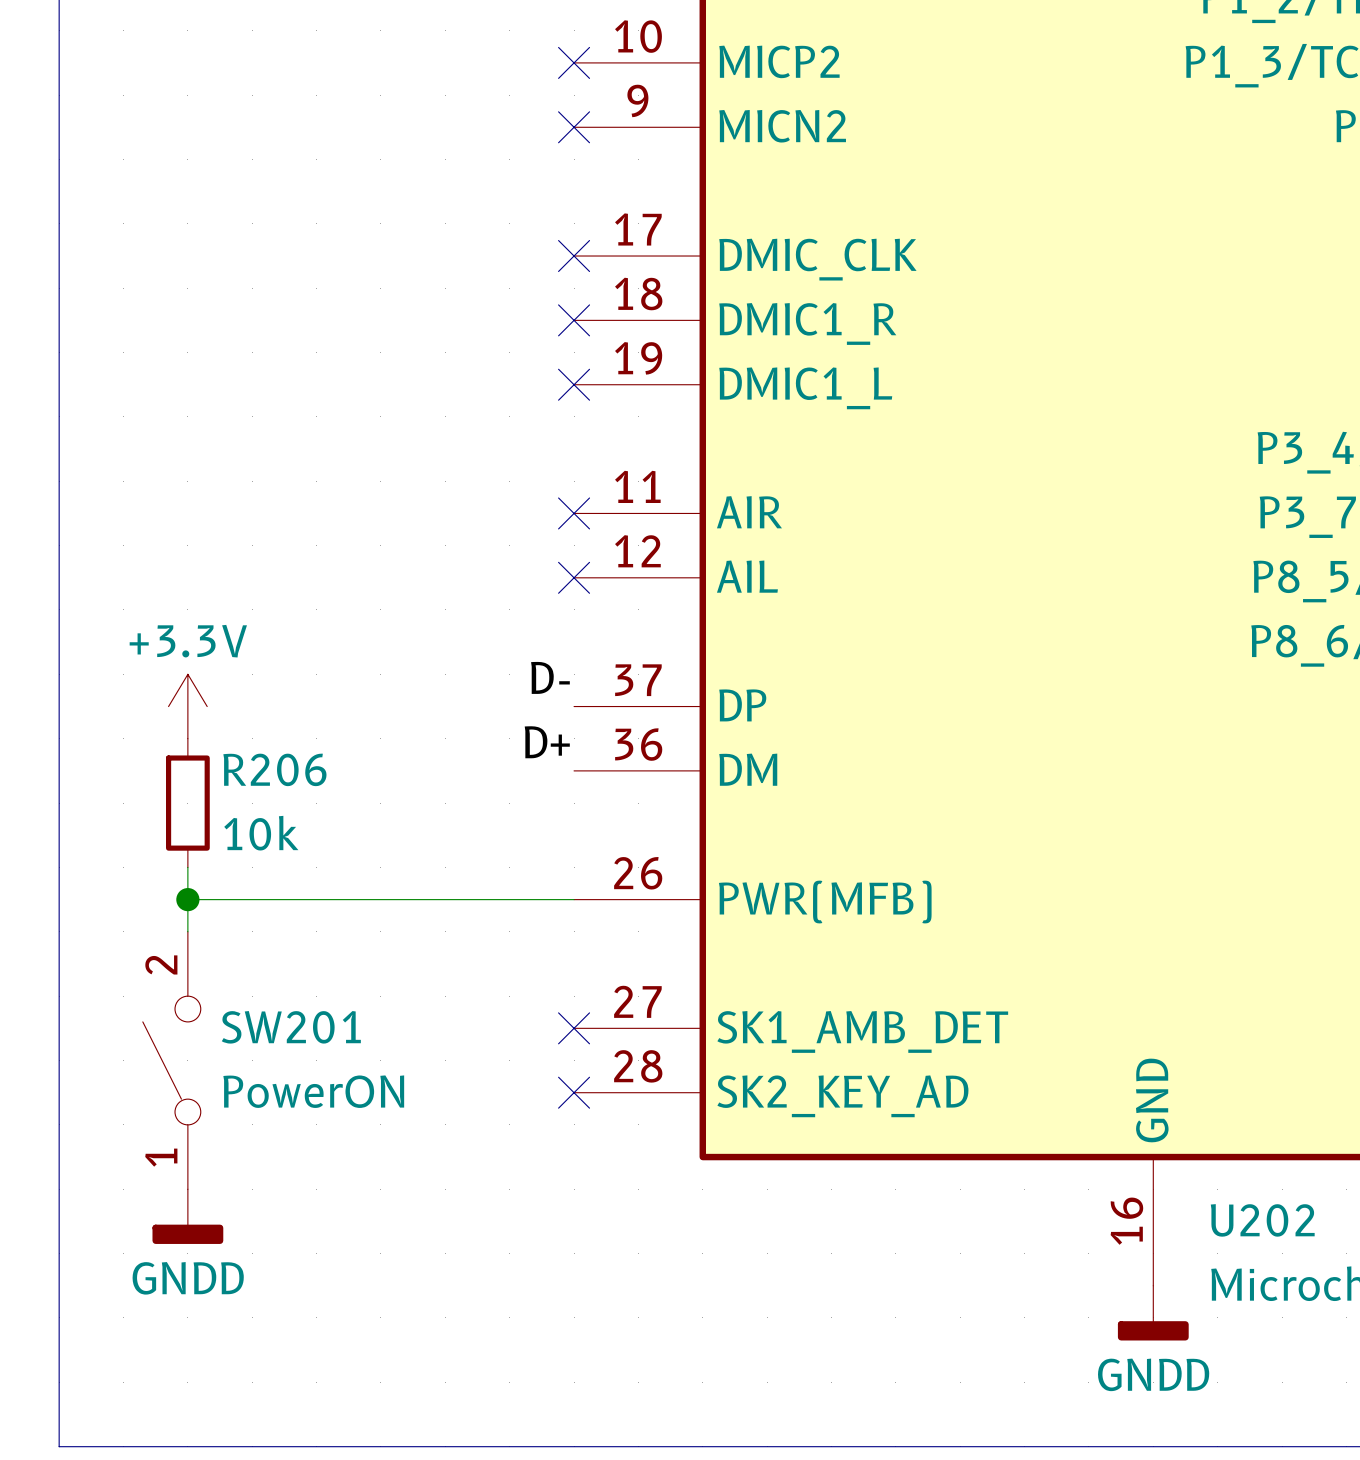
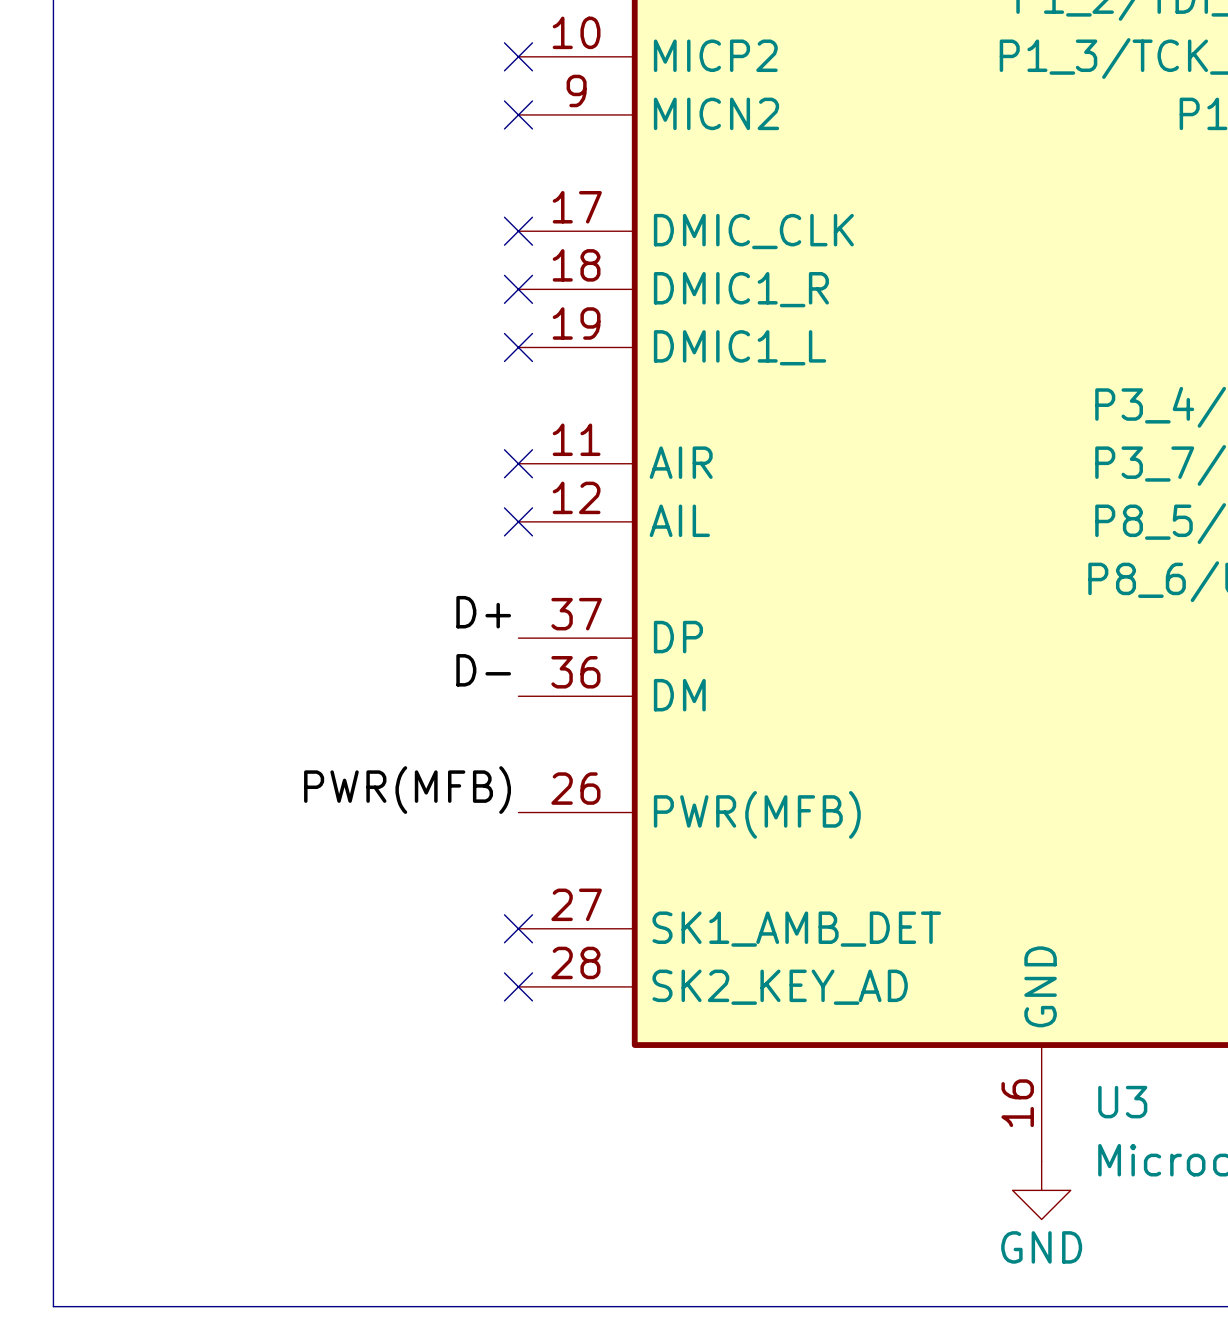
label: D- (550, 677) -> D+ (483, 612)
power symbol: +3.3V (187, 706) -> none
label: D+ (547, 742) -> D- (483, 670)
R206: 10k (187, 803) -> none
wire: (187, 867) (187, 931) -> none
label: none -> PWR(MFB) (407, 790)
wire: (187, 899) (574, 899) -> none
junction: (187, 899) -> none
SW201: PowerON (171, 1060) -> none
power symbol: GNDD (187, 1216) -> none
U202 name: U202 (1262, 1220) -> U3 (1122, 1102)
power symbol: GNDD (1153, 1313) -> GND (1041, 1190)

